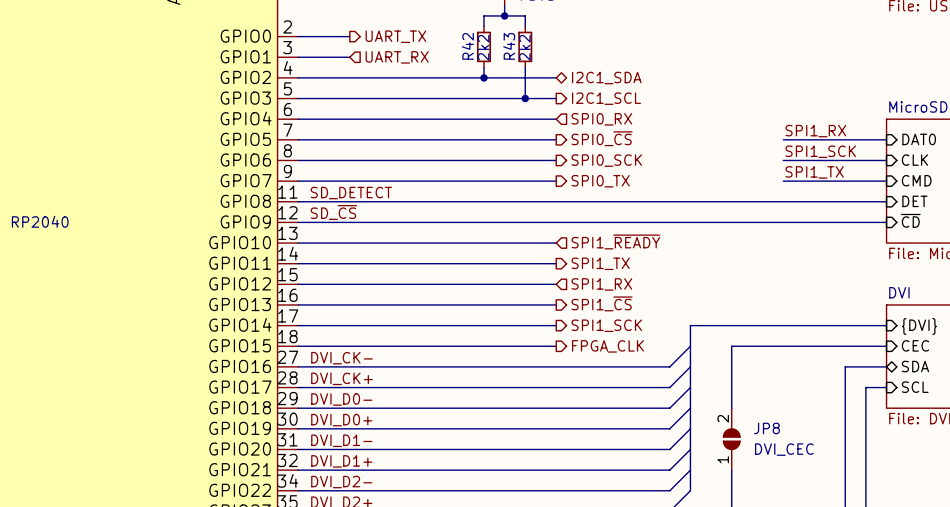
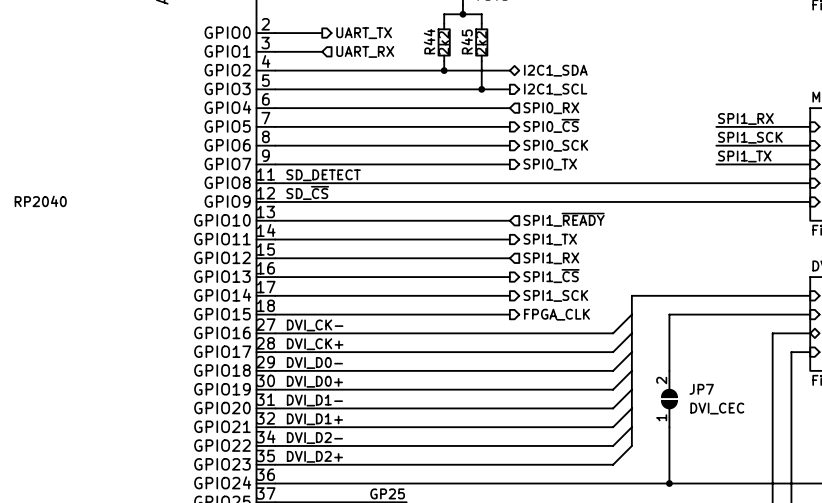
R42 name: R42 (467, 46) -> R44 (429, 41)
R43 name: R43 (509, 46) -> R45 (467, 41)
JP8 name: JP8 (766, 428) -> JP7 (701, 389)

